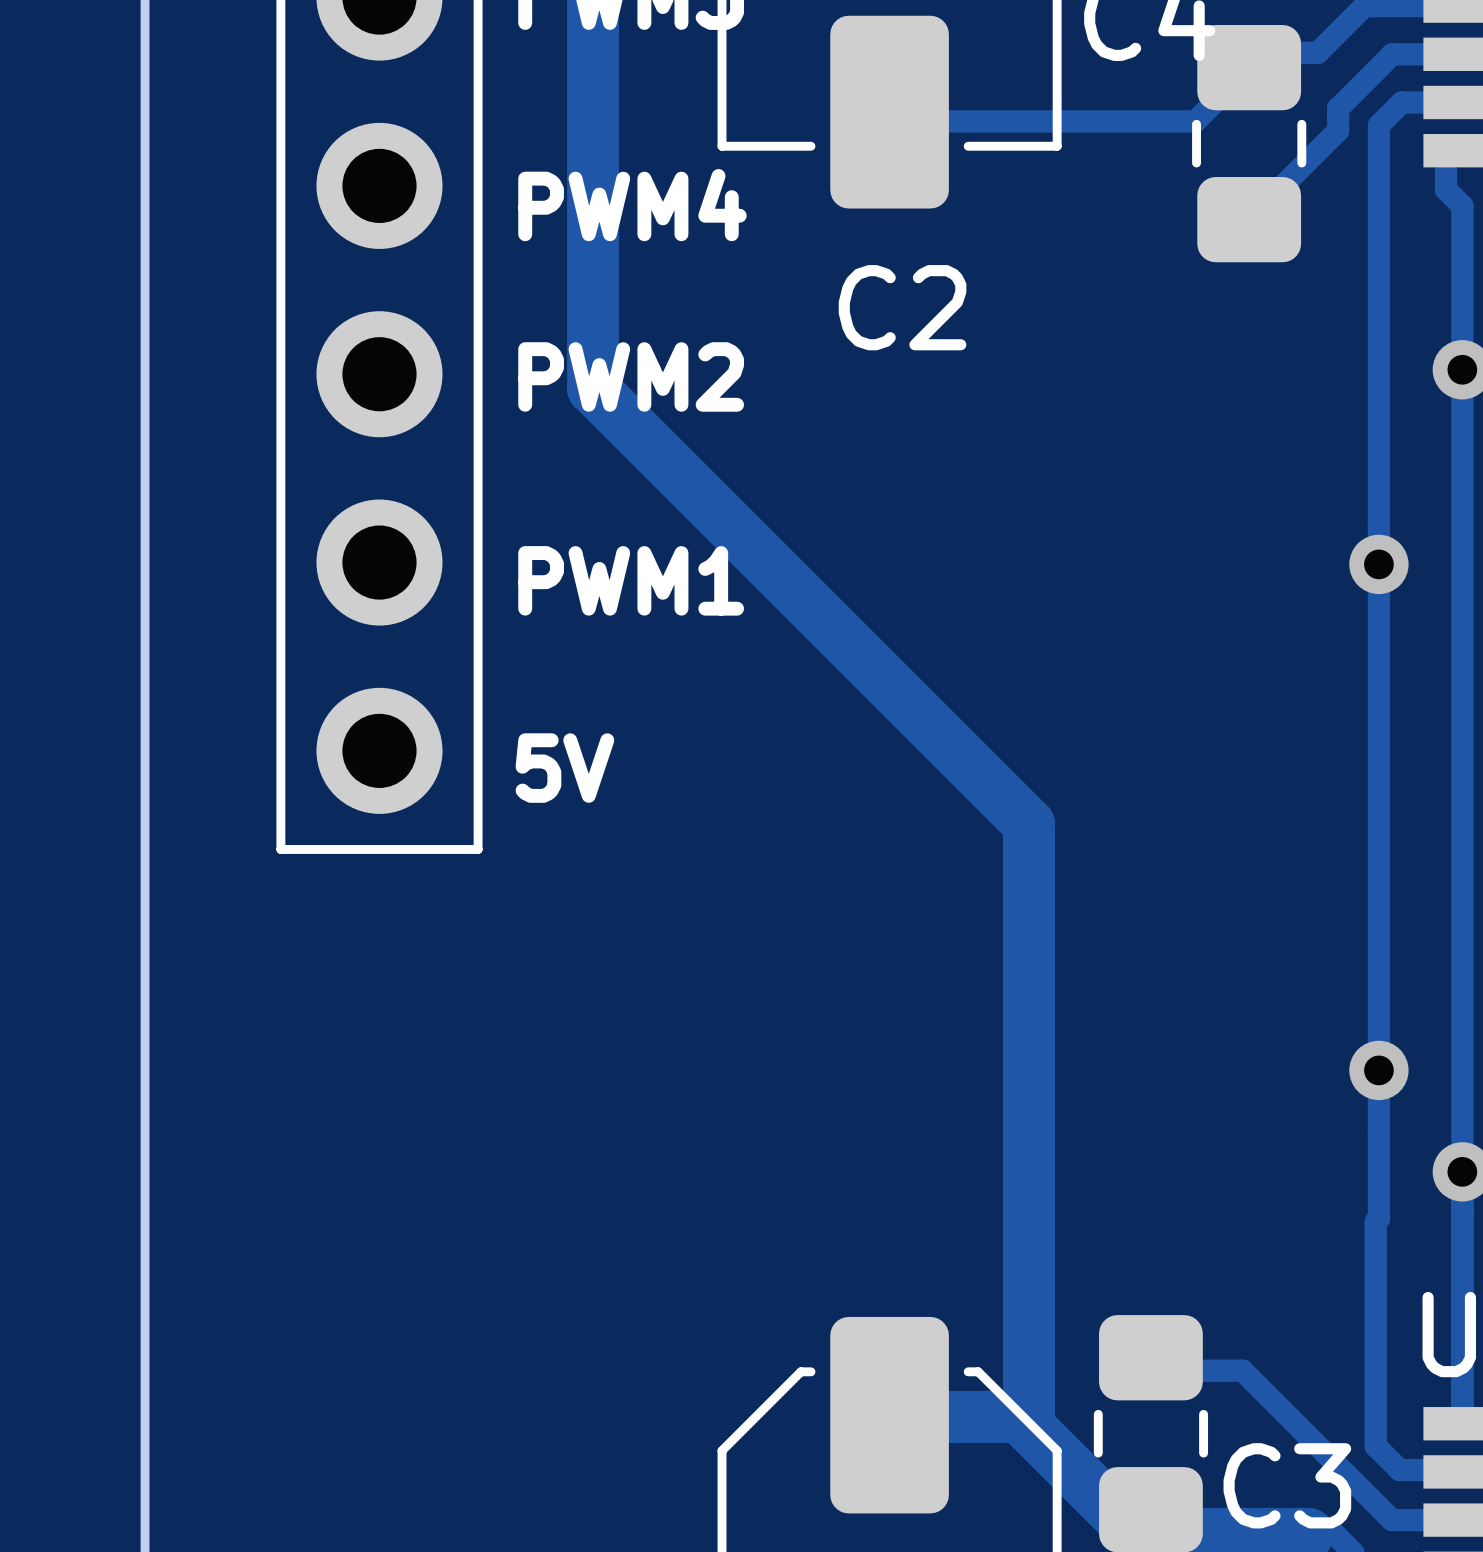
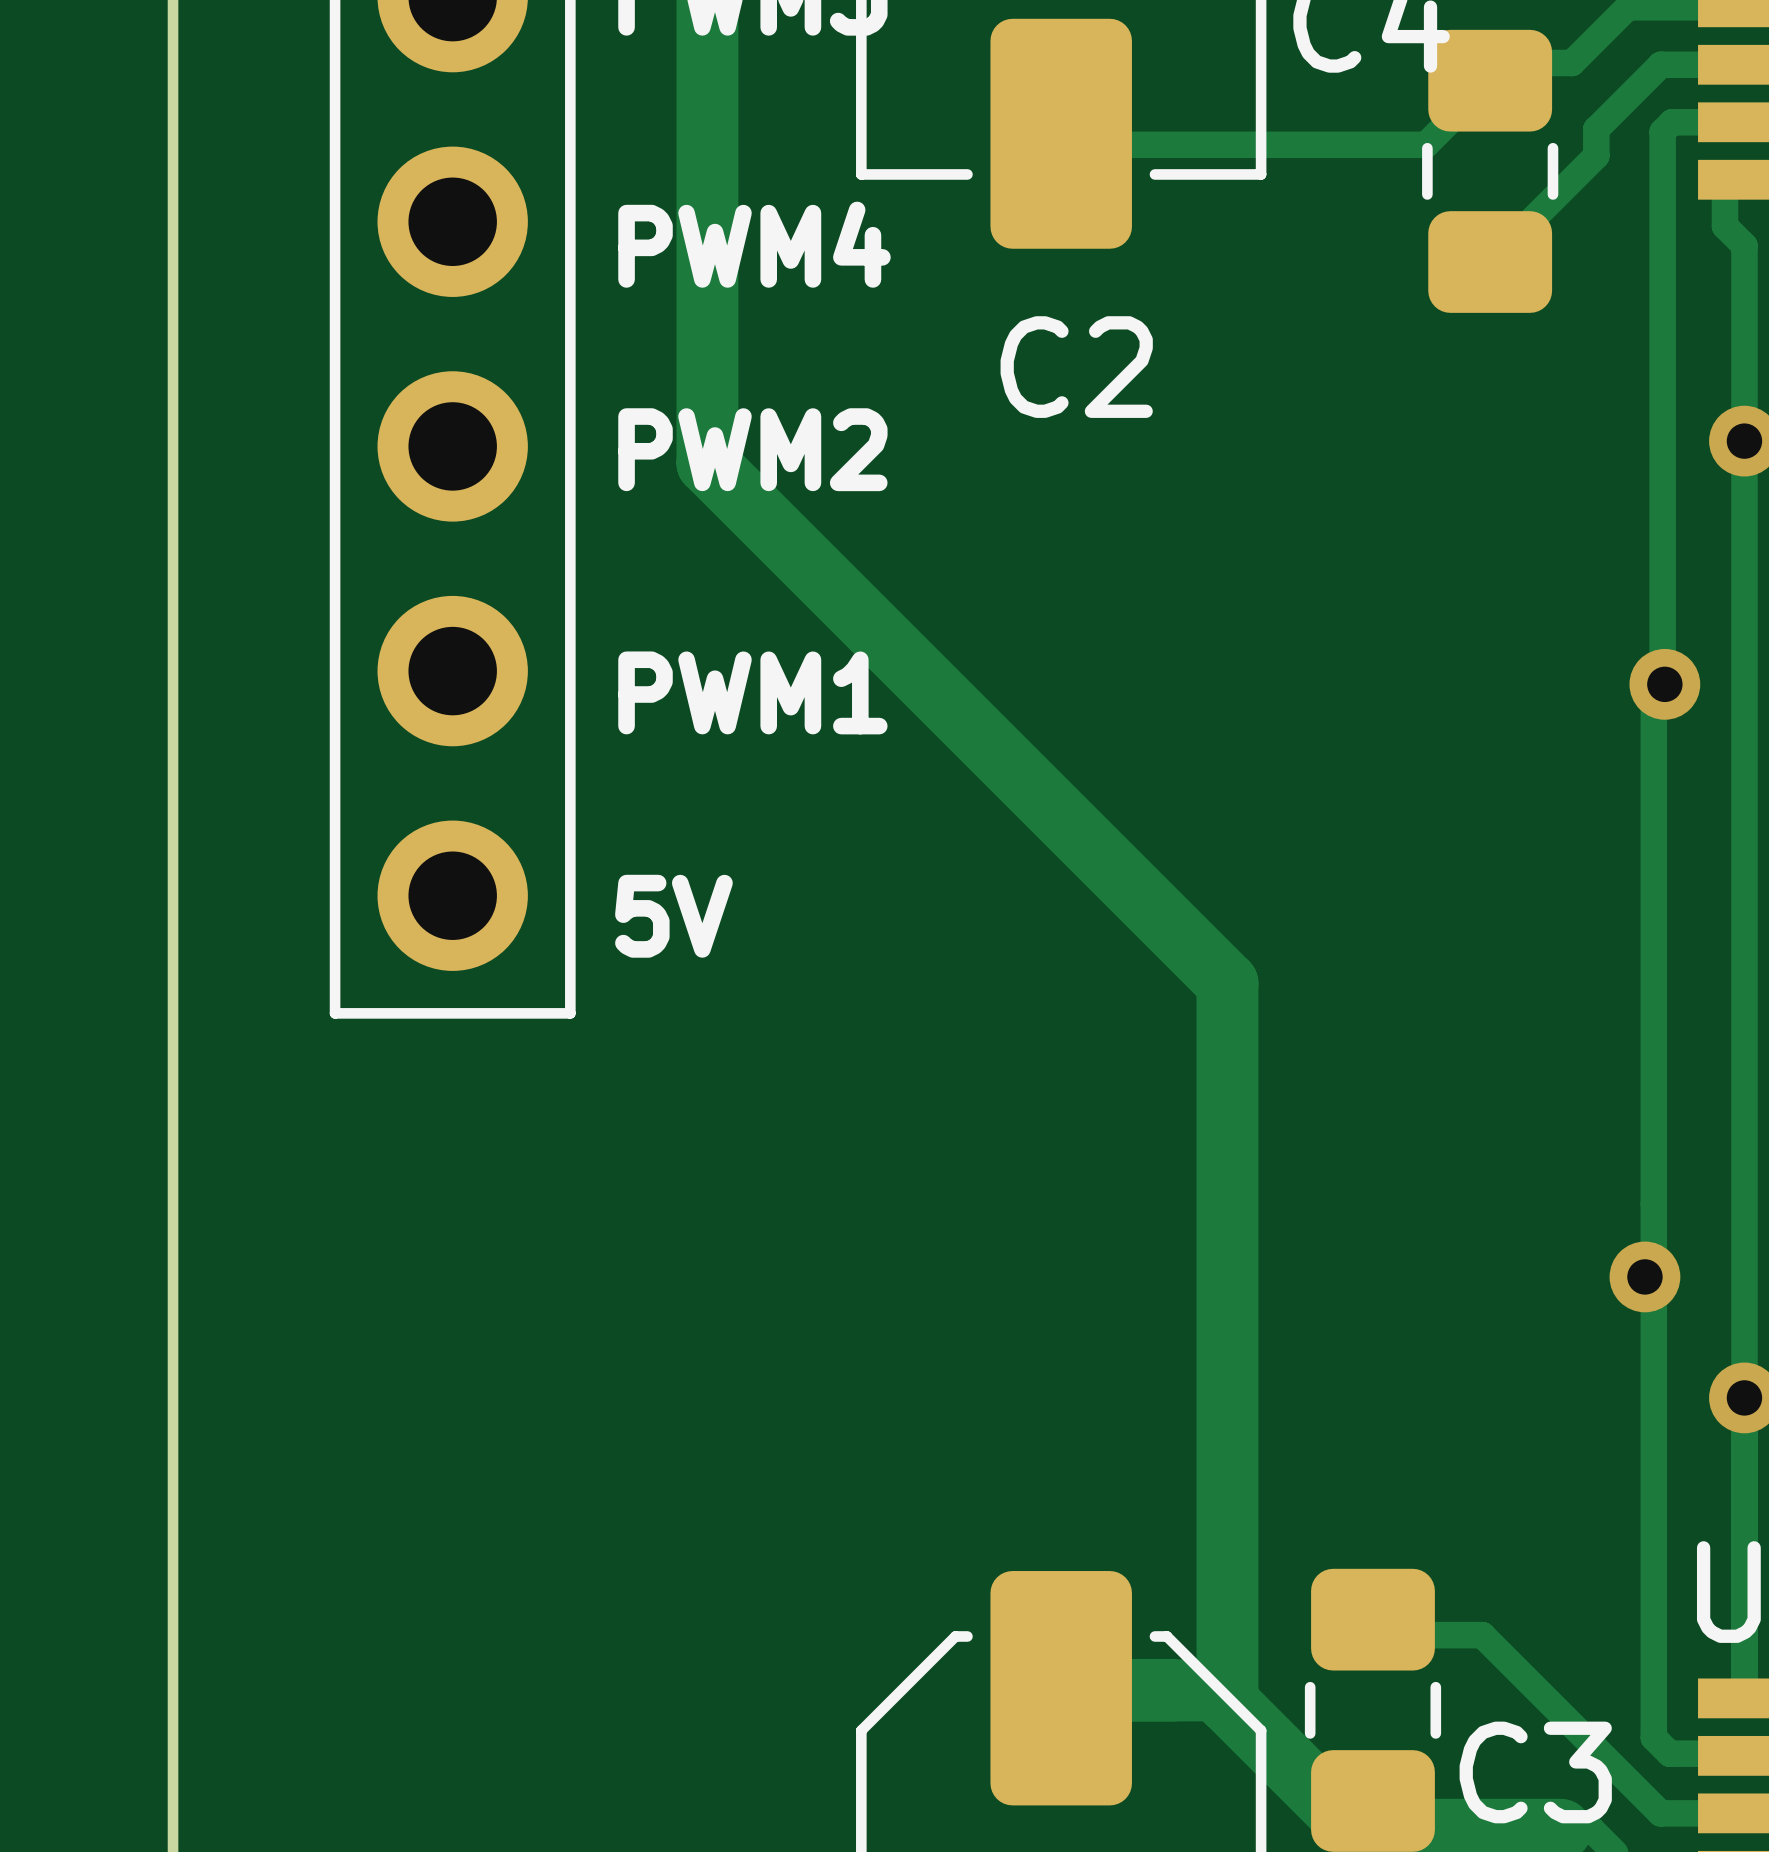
track: (1393, 110) (1378, 125) (1378, 1218) (1375, 1221) (1375, 1446) (1386, 1456) -> (1662, 131) (1662, 682) (1664, 684) (1653, 695) (1653, 1737)
via position: (1378, 564) -> (1664, 684)

